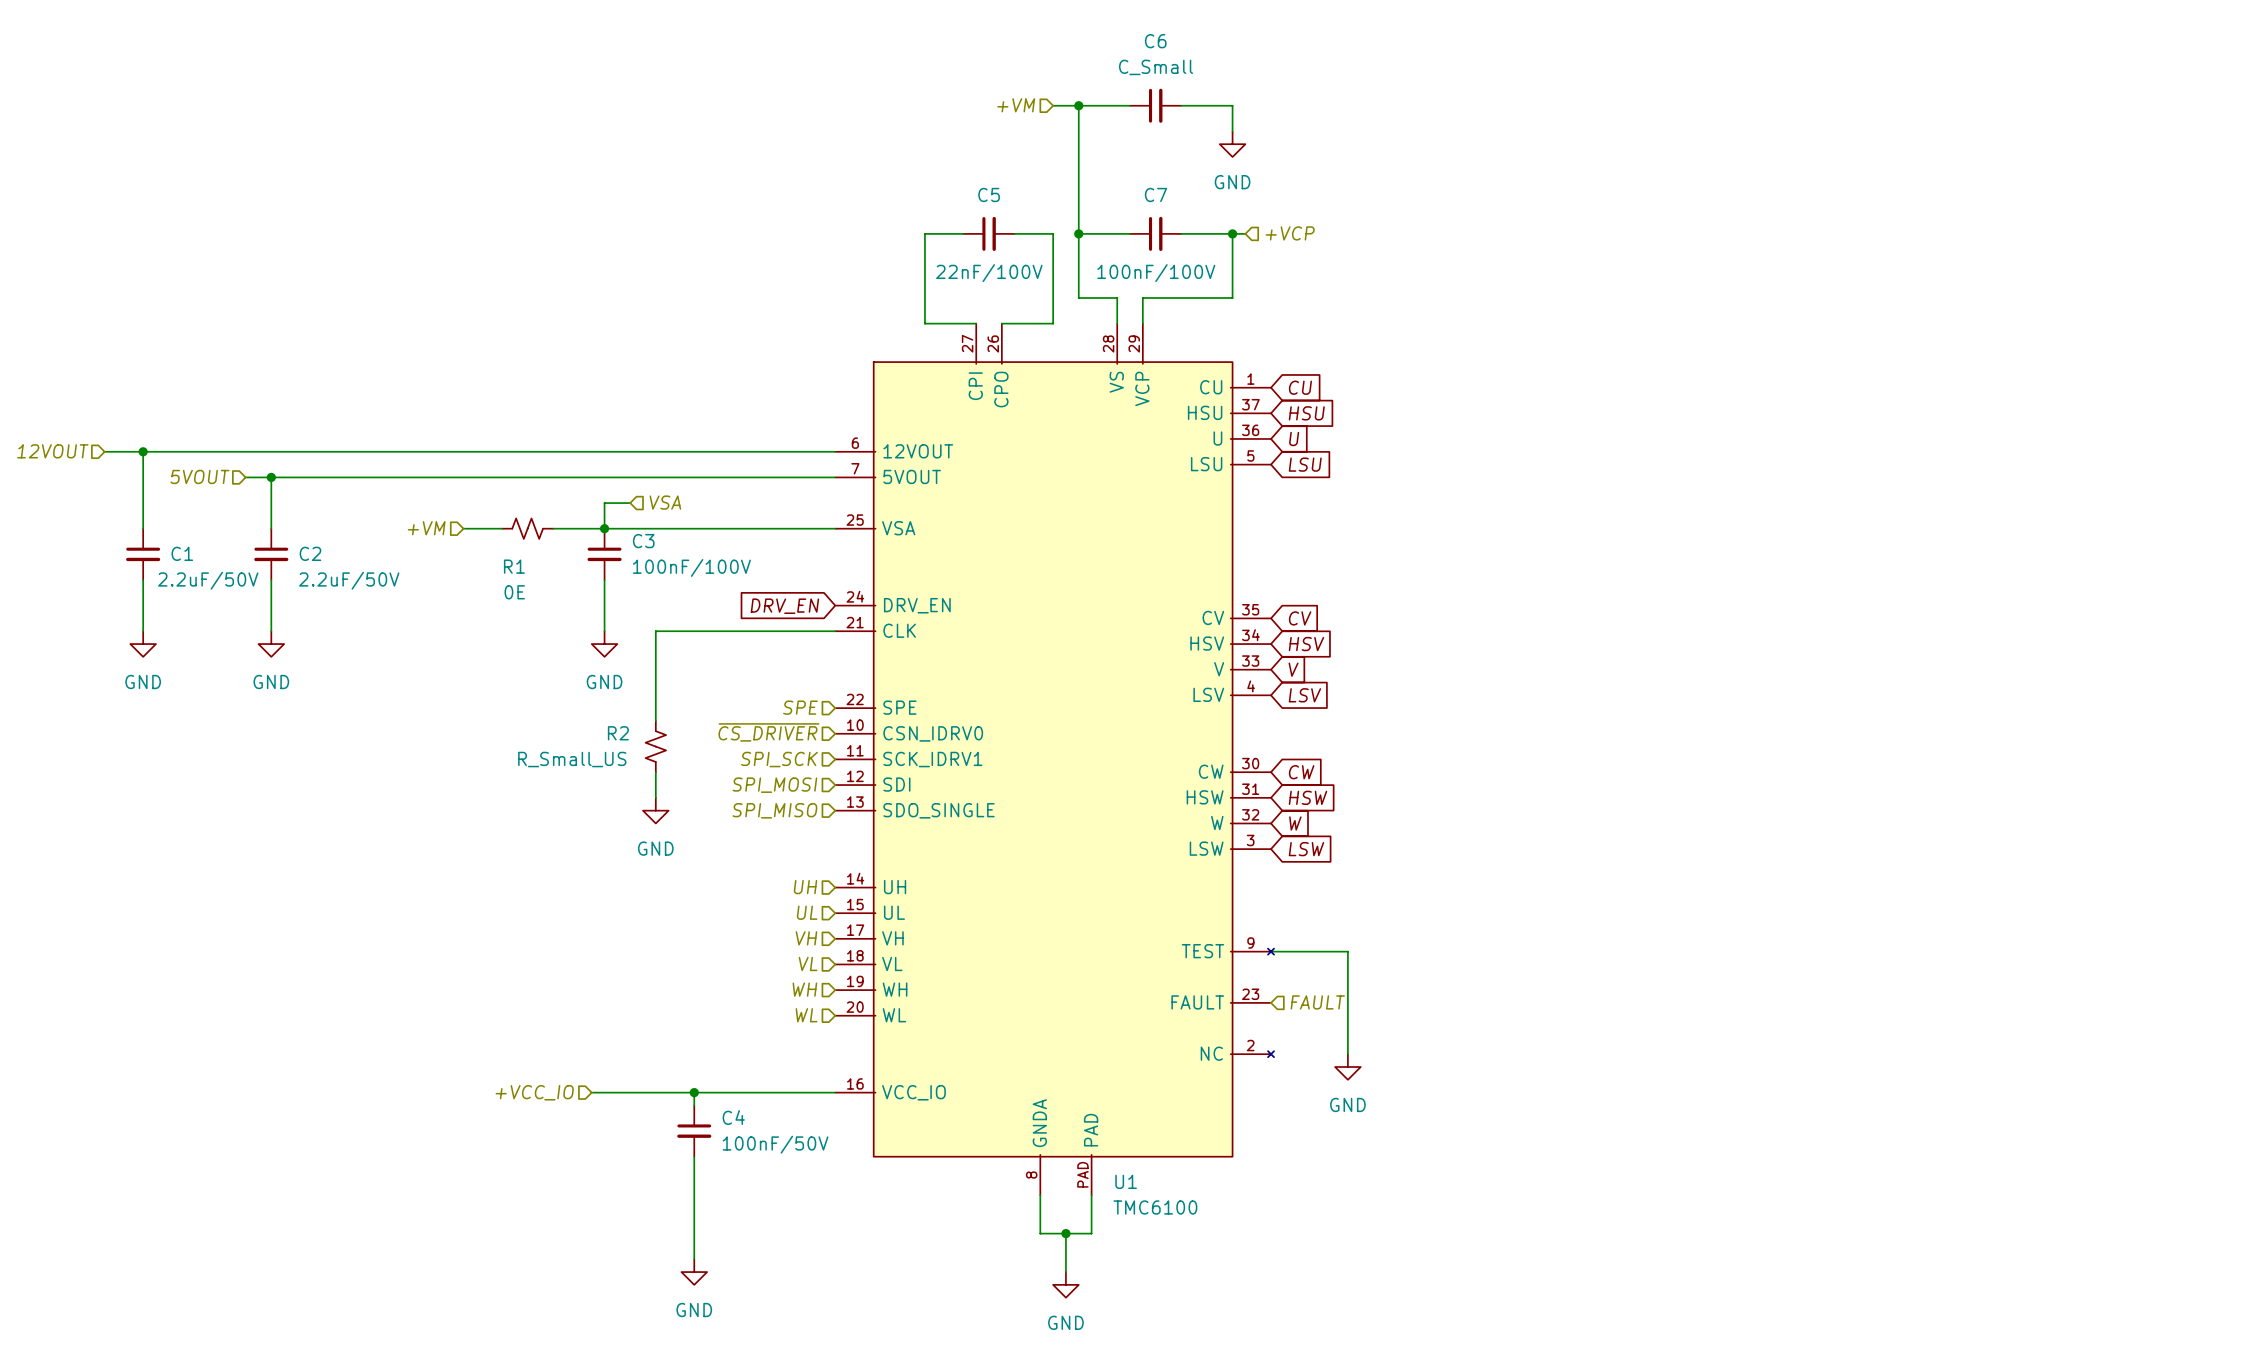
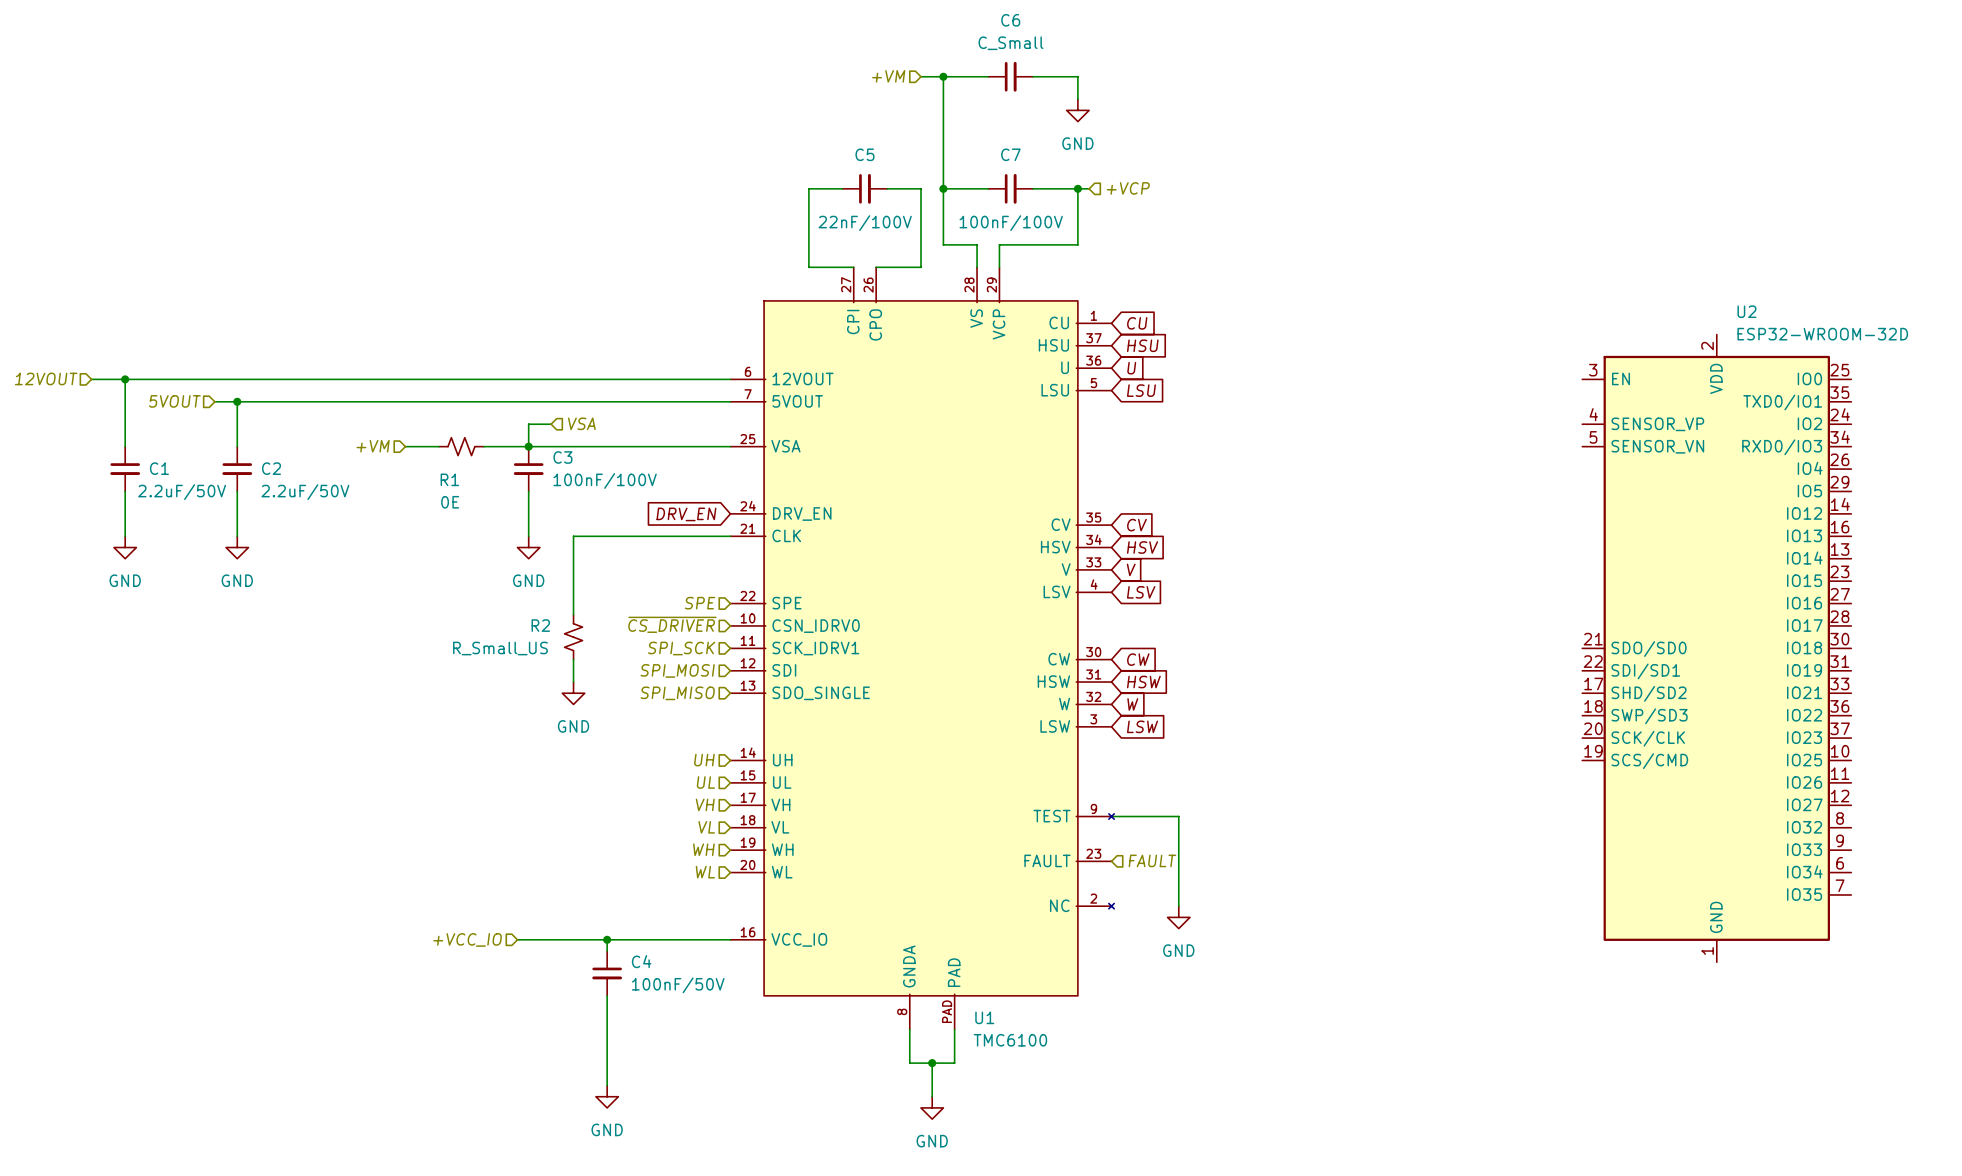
U2: none -> ESP32-WROOM-32D (1716, 648)

